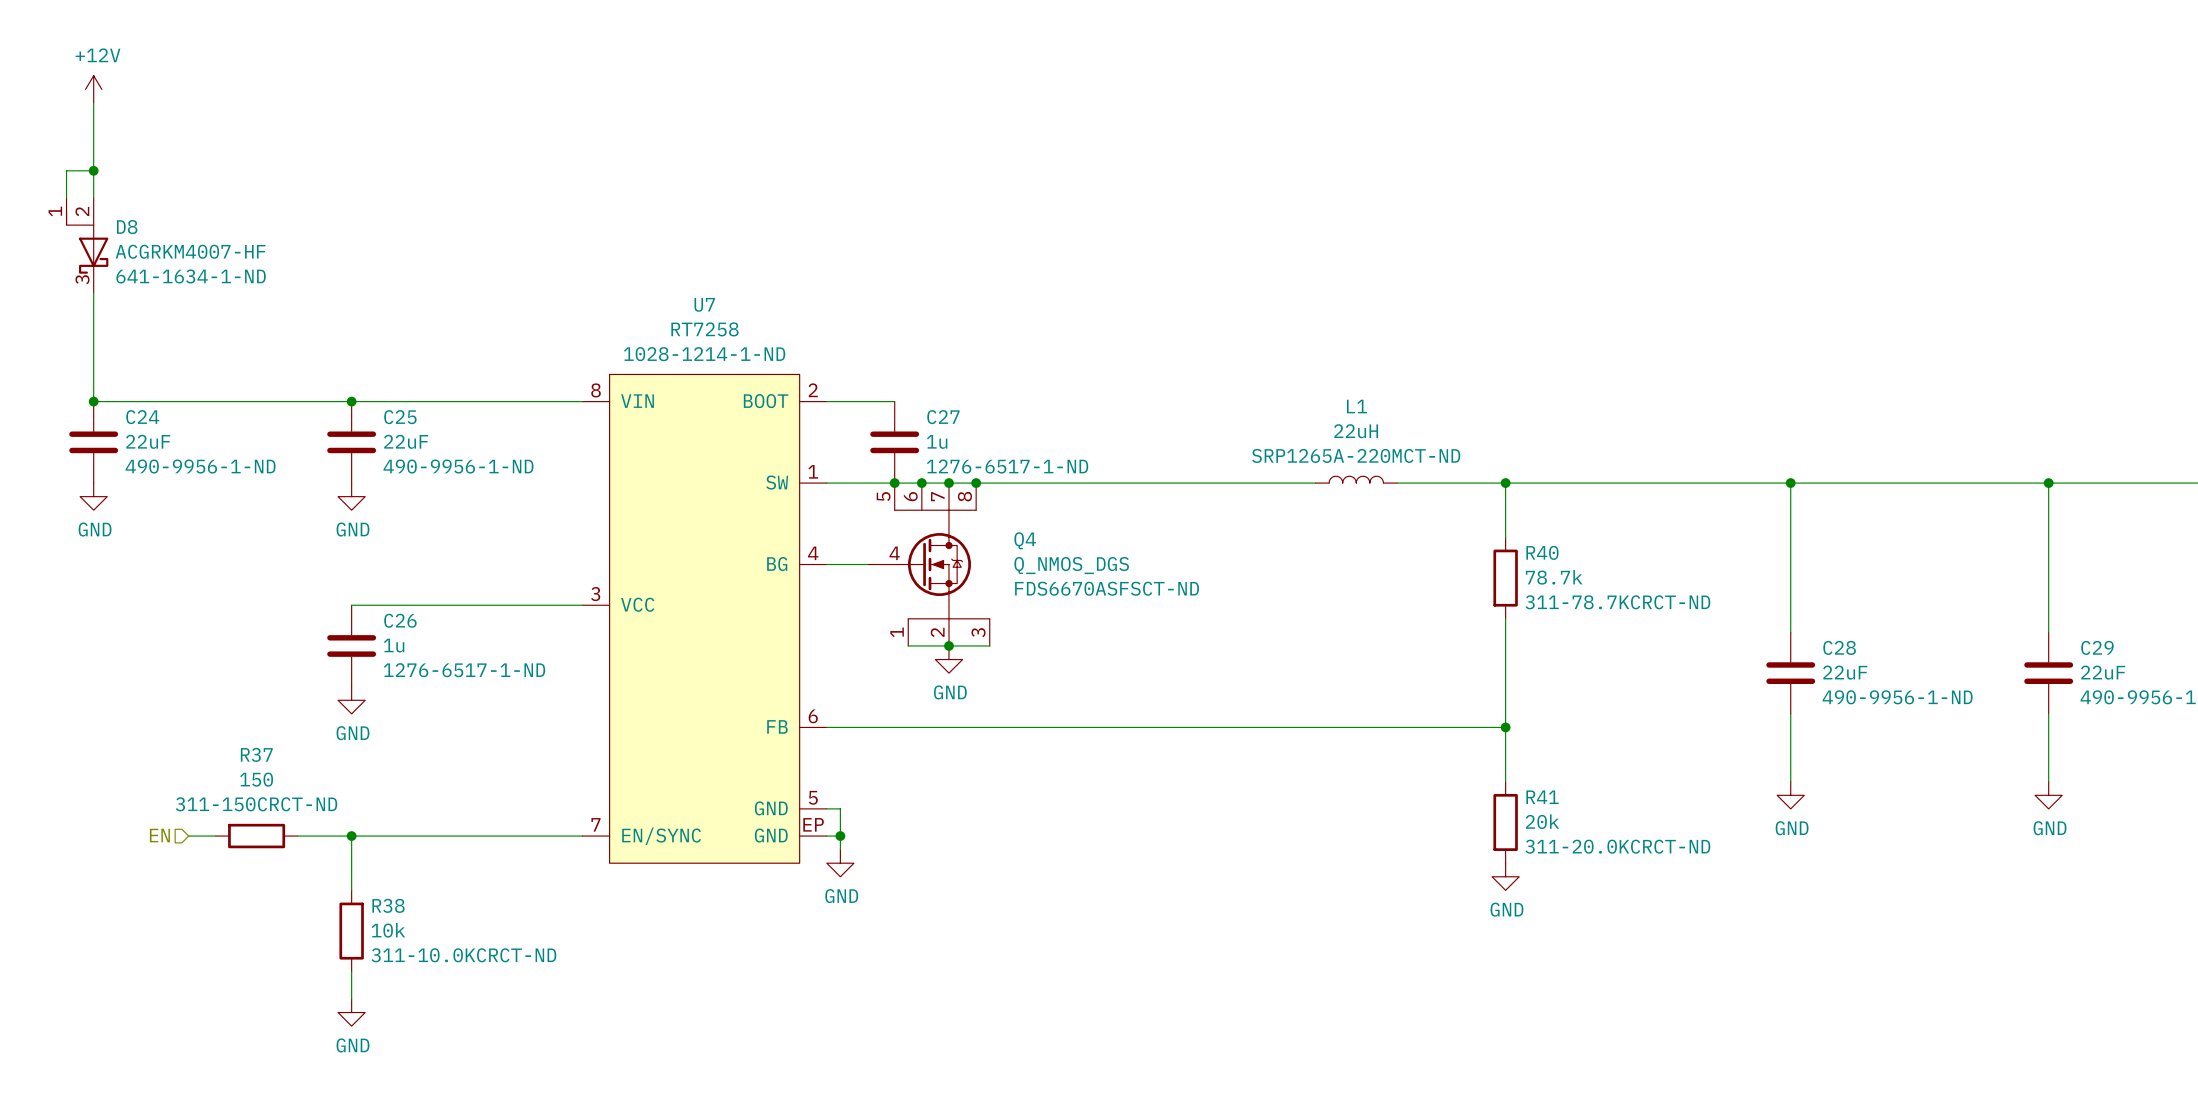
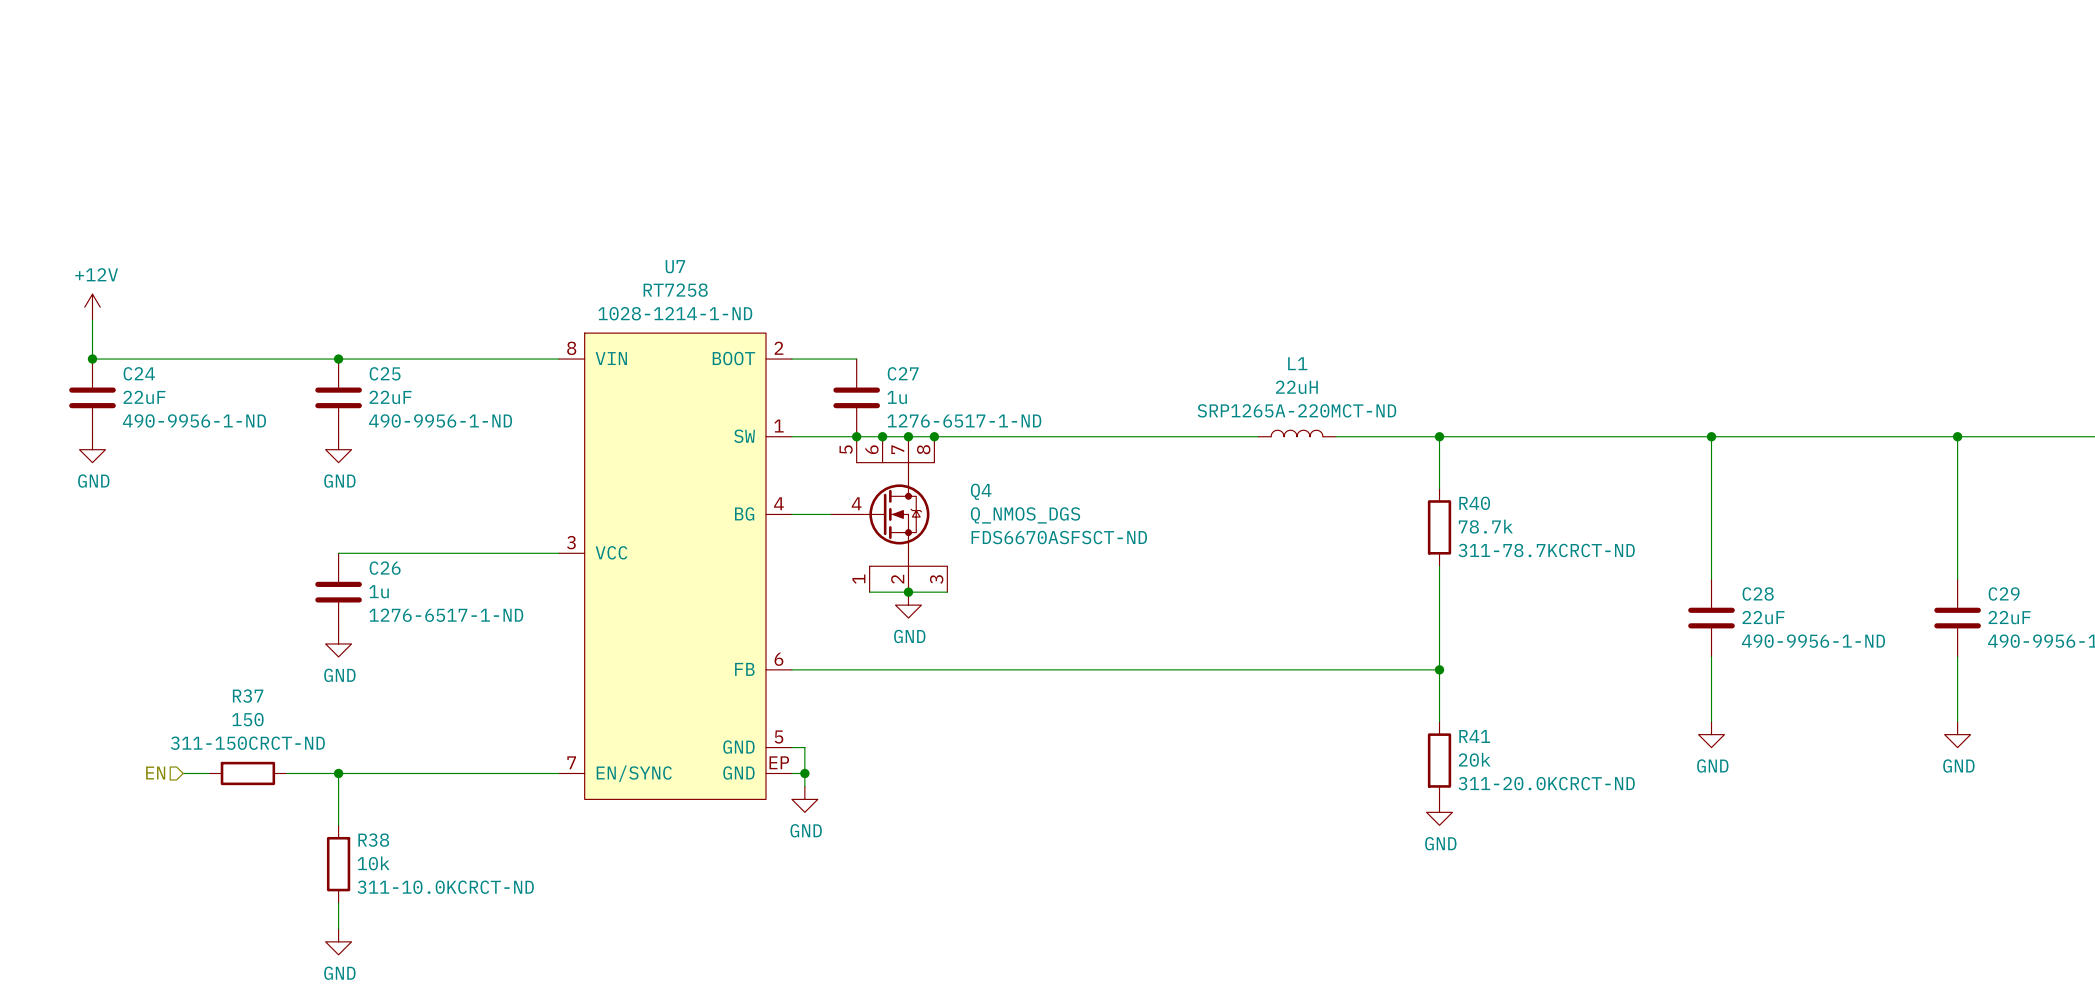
power symbol position: +12V (93, 89) -> +12V (92, 307)
wire: (93, 102) (93, 197) -> none
wire: (93, 170) (66, 170) (66, 197) -> none
junction: (93, 170) -> none
D8: ACGRKM4007-HF (87, 245) -> none
wire: (93, 292) (93, 360) -> none

